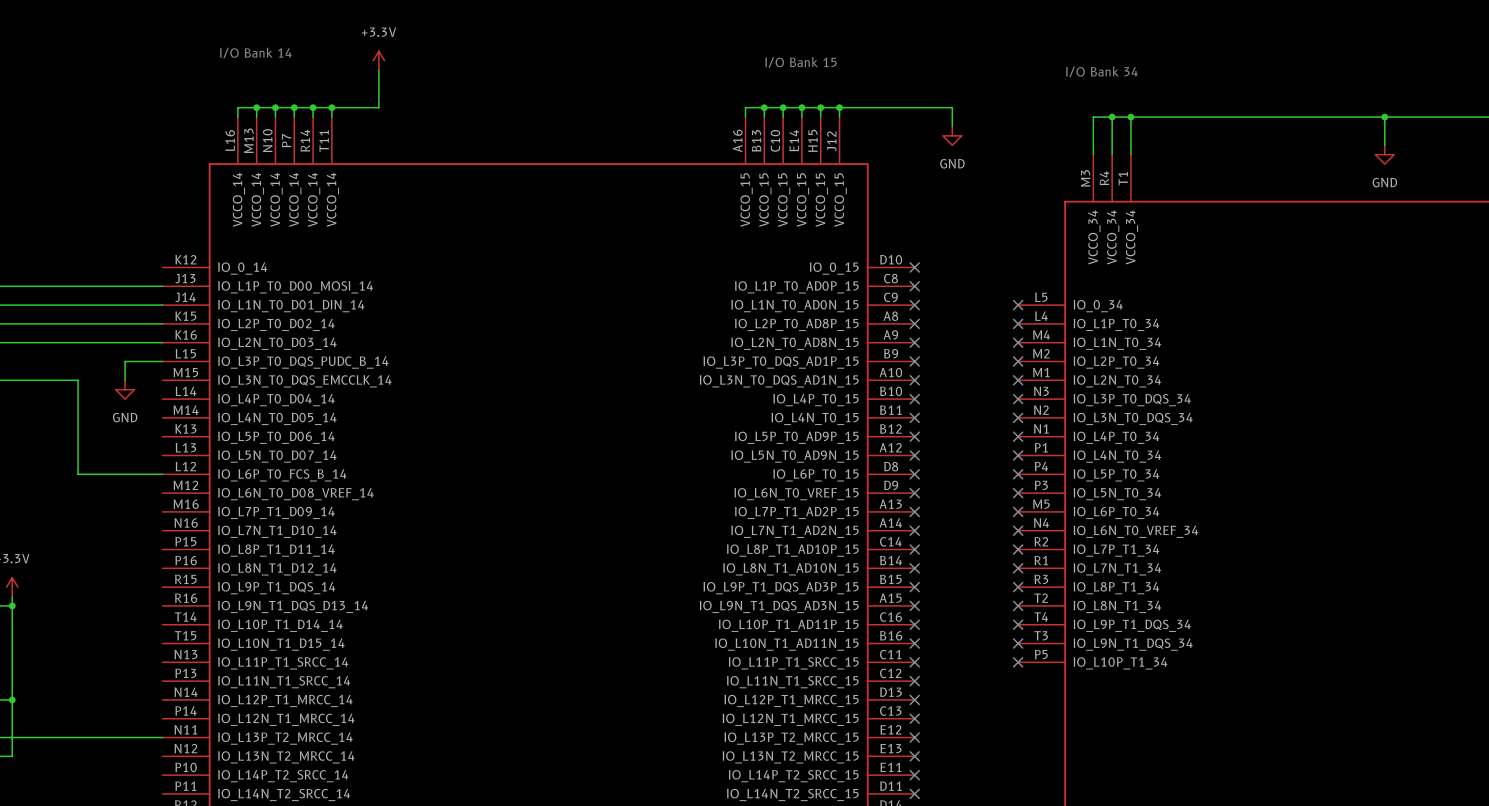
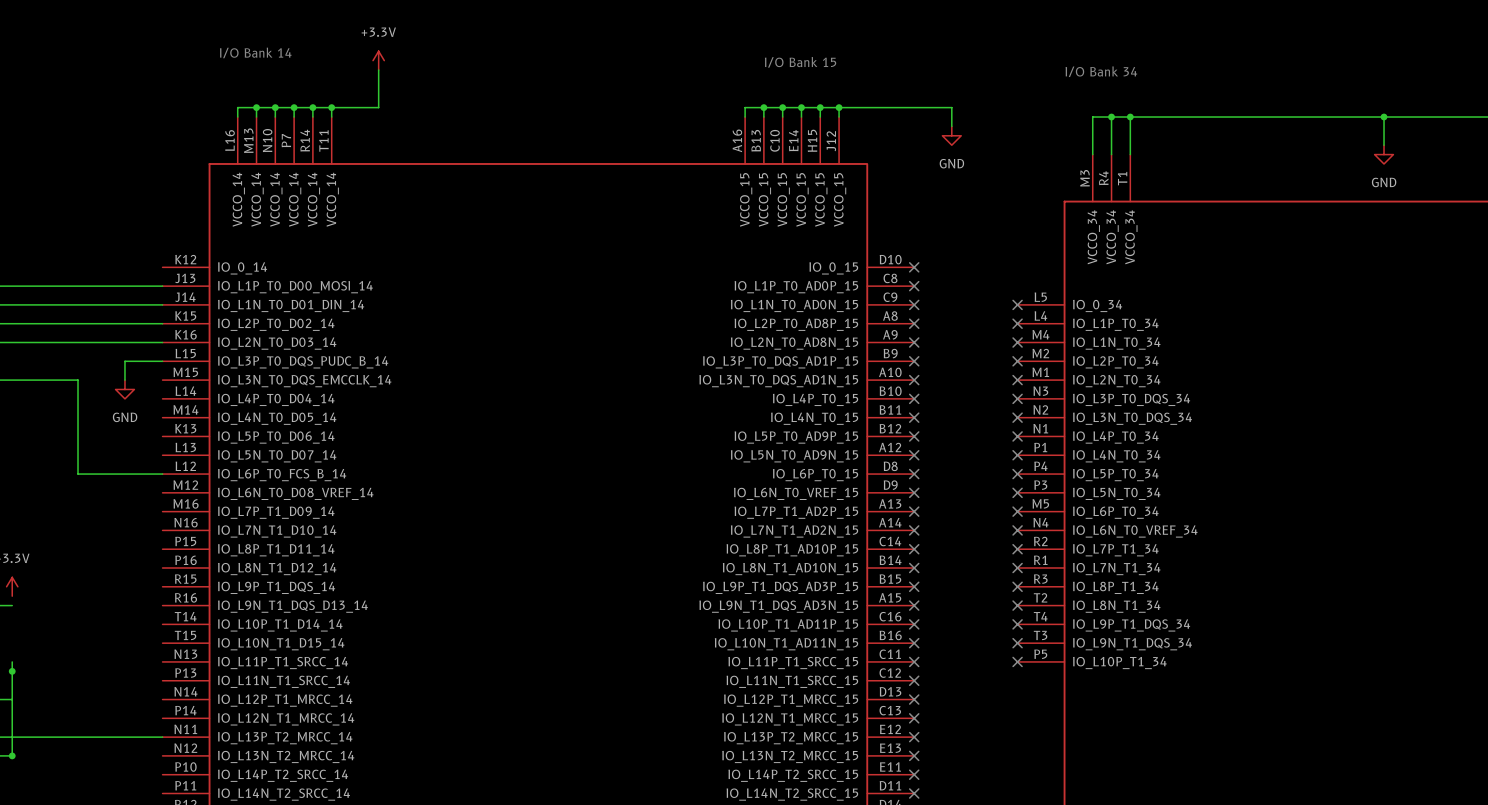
wire: (12, 596) (12, 662) -> none
junction: (12, 605) -> none
junction: none -> (12, 671)
junction: (12, 699) -> none
junction: none -> (12, 755)

